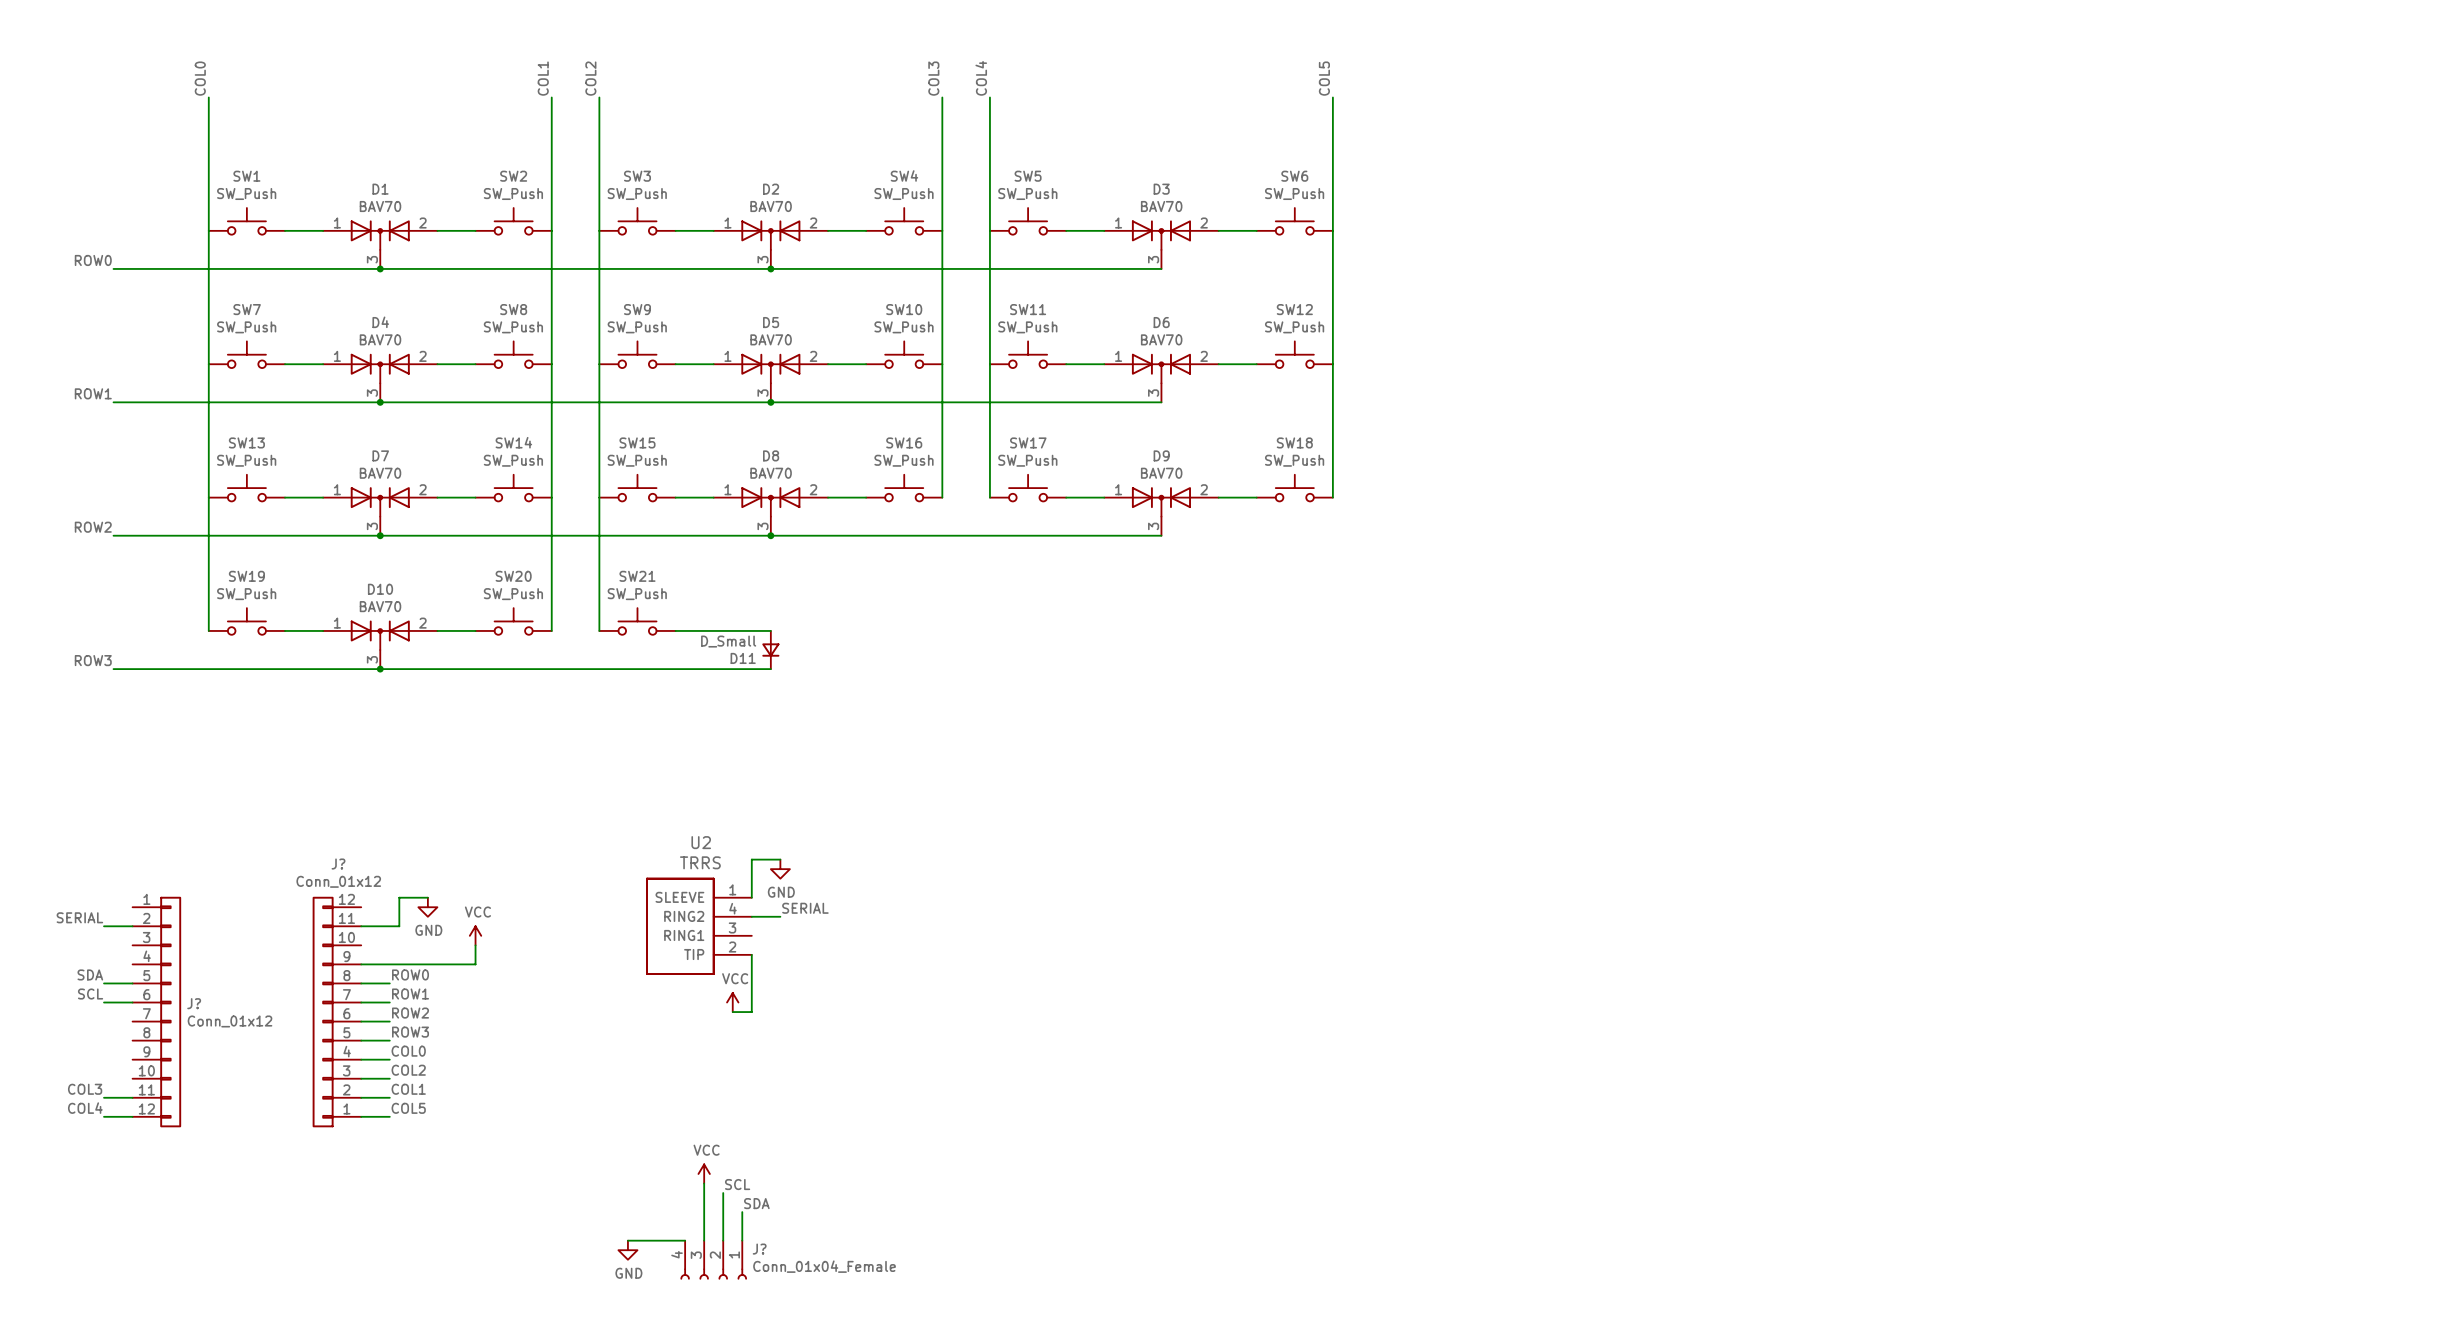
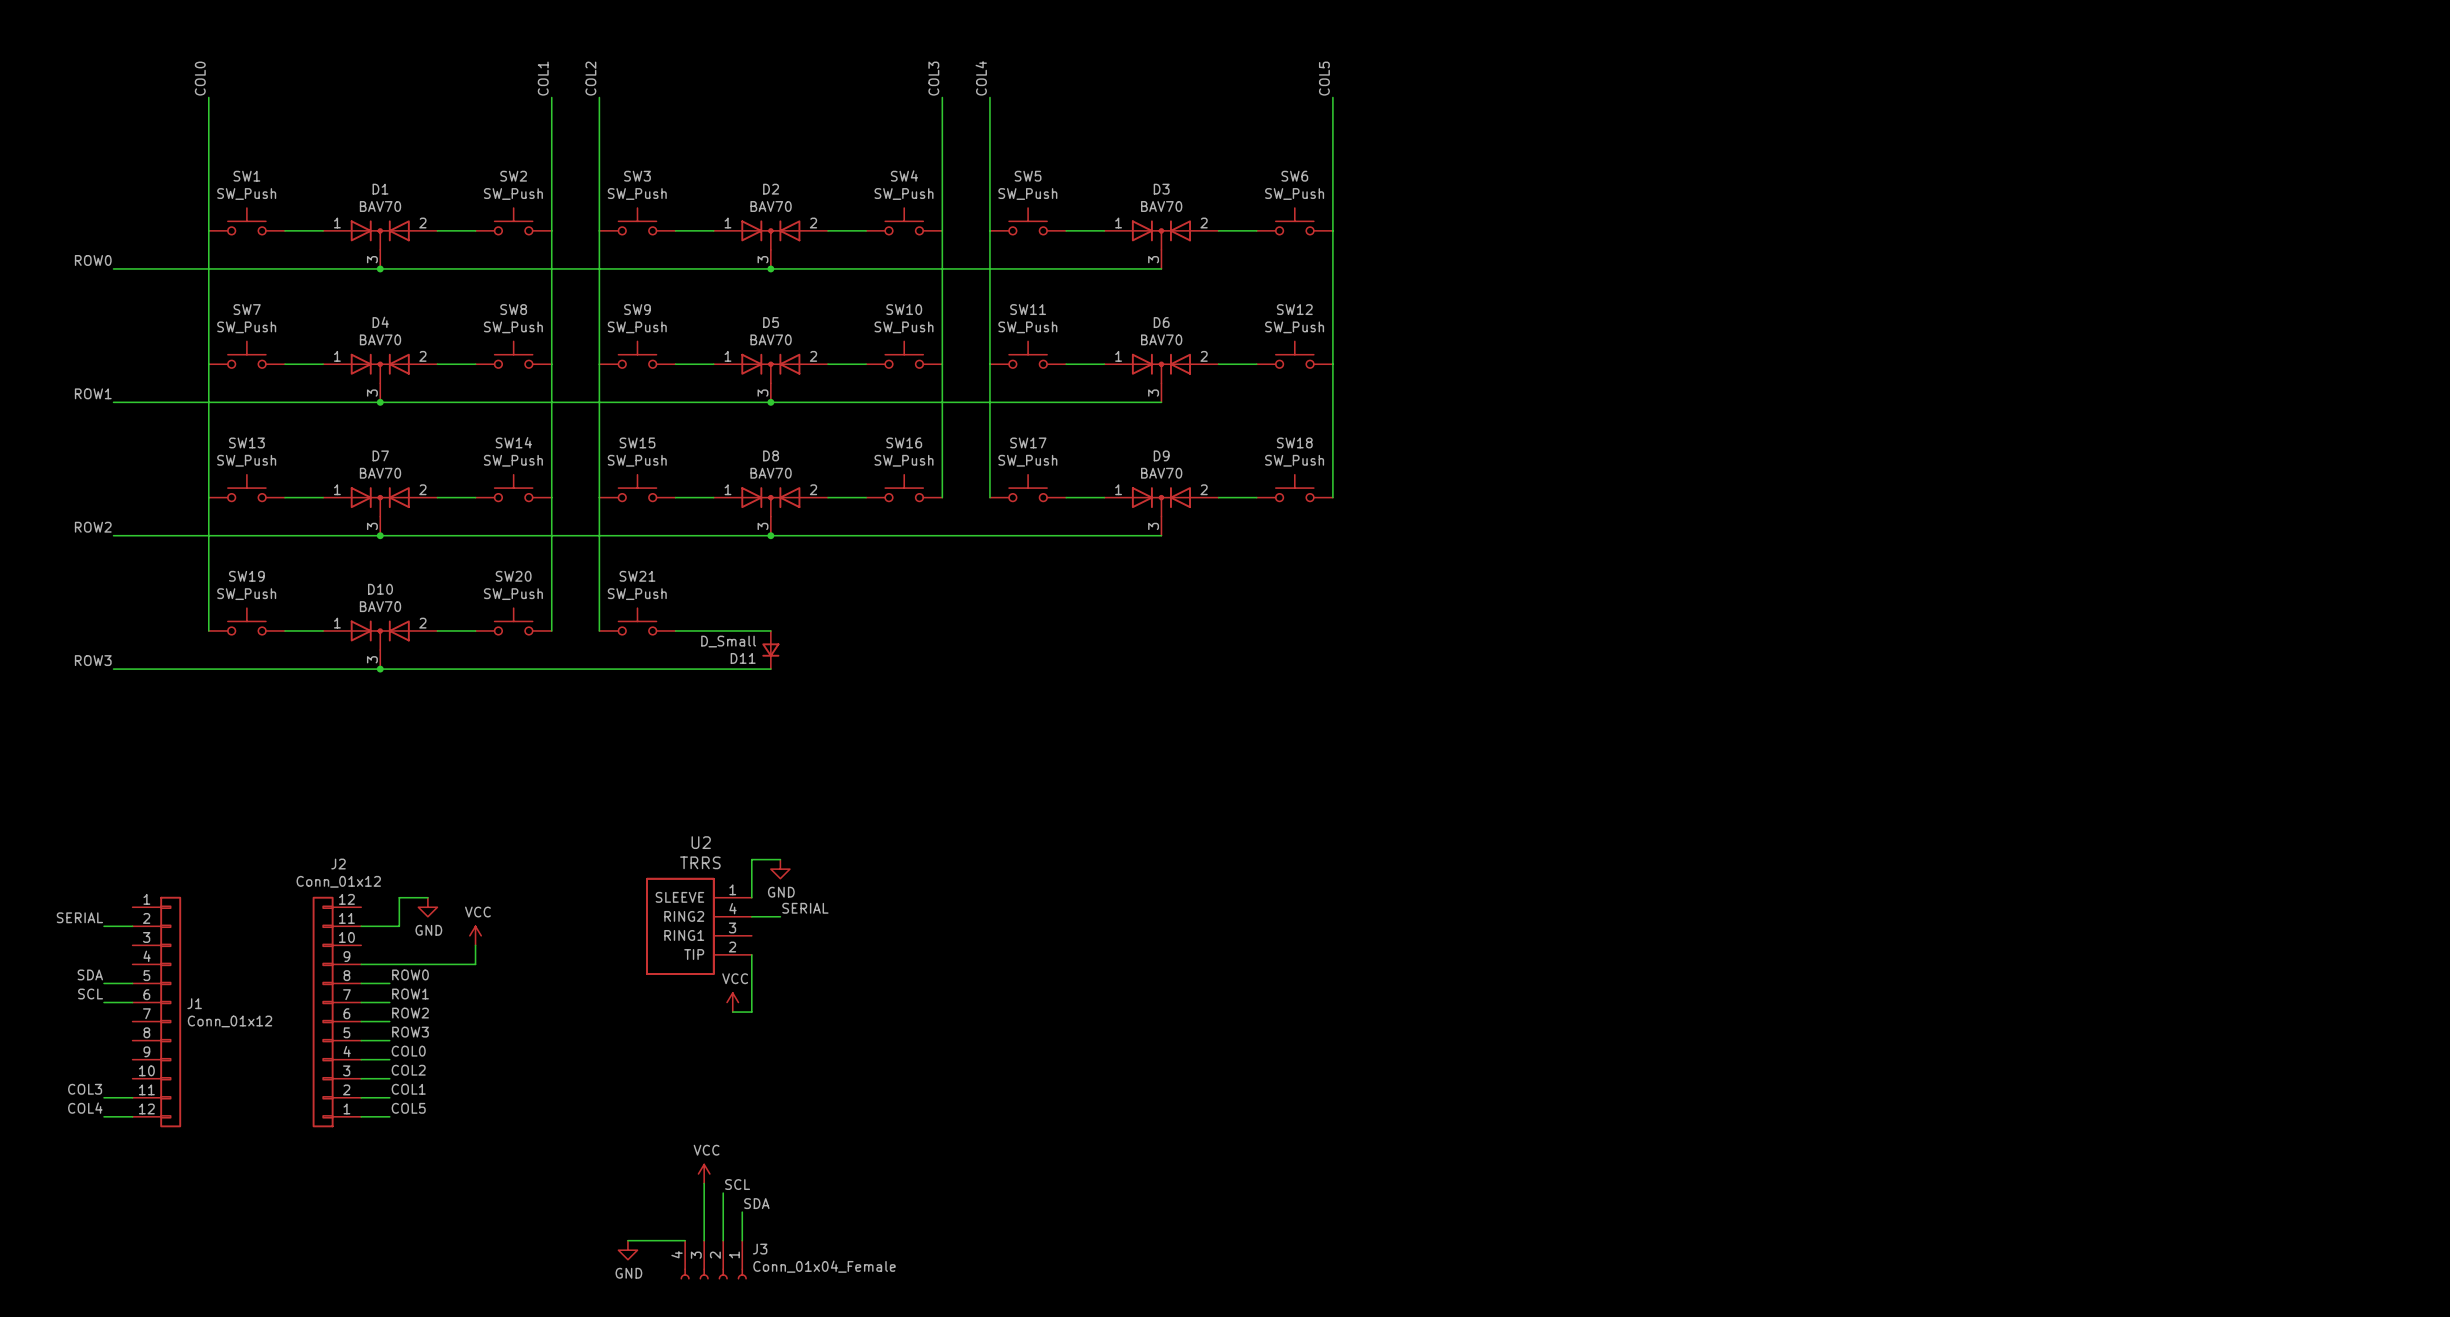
J? name: J? (338, 864) -> J2 (338, 864)
J? name: J? (194, 1003) -> J1 (194, 1003)
J? name: J? (759, 1249) -> J3 (760, 1249)

